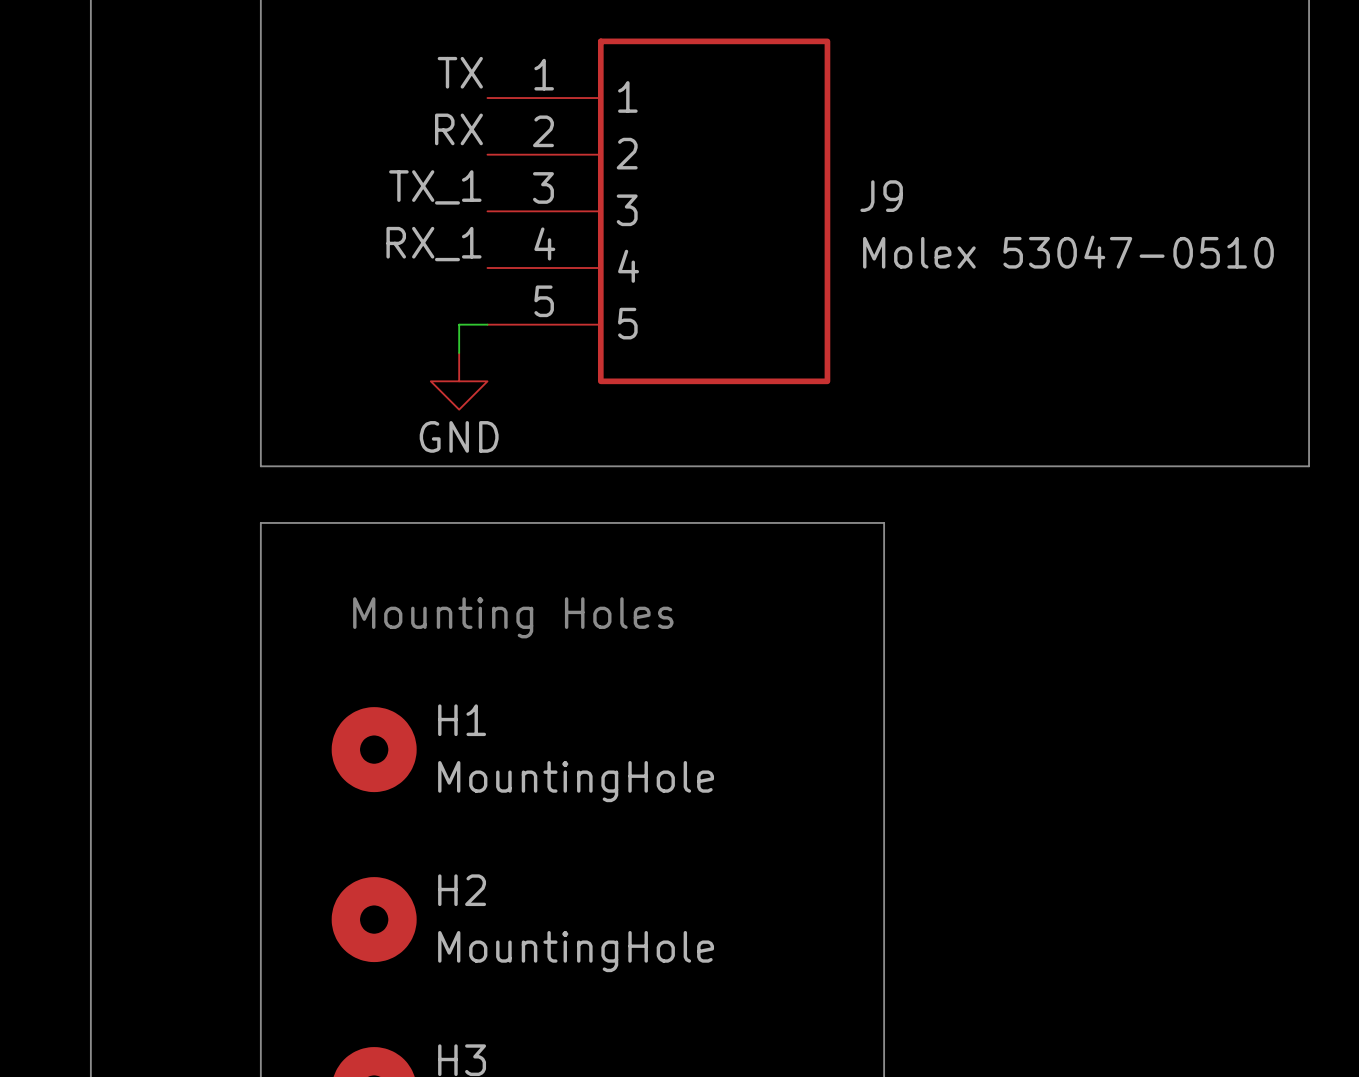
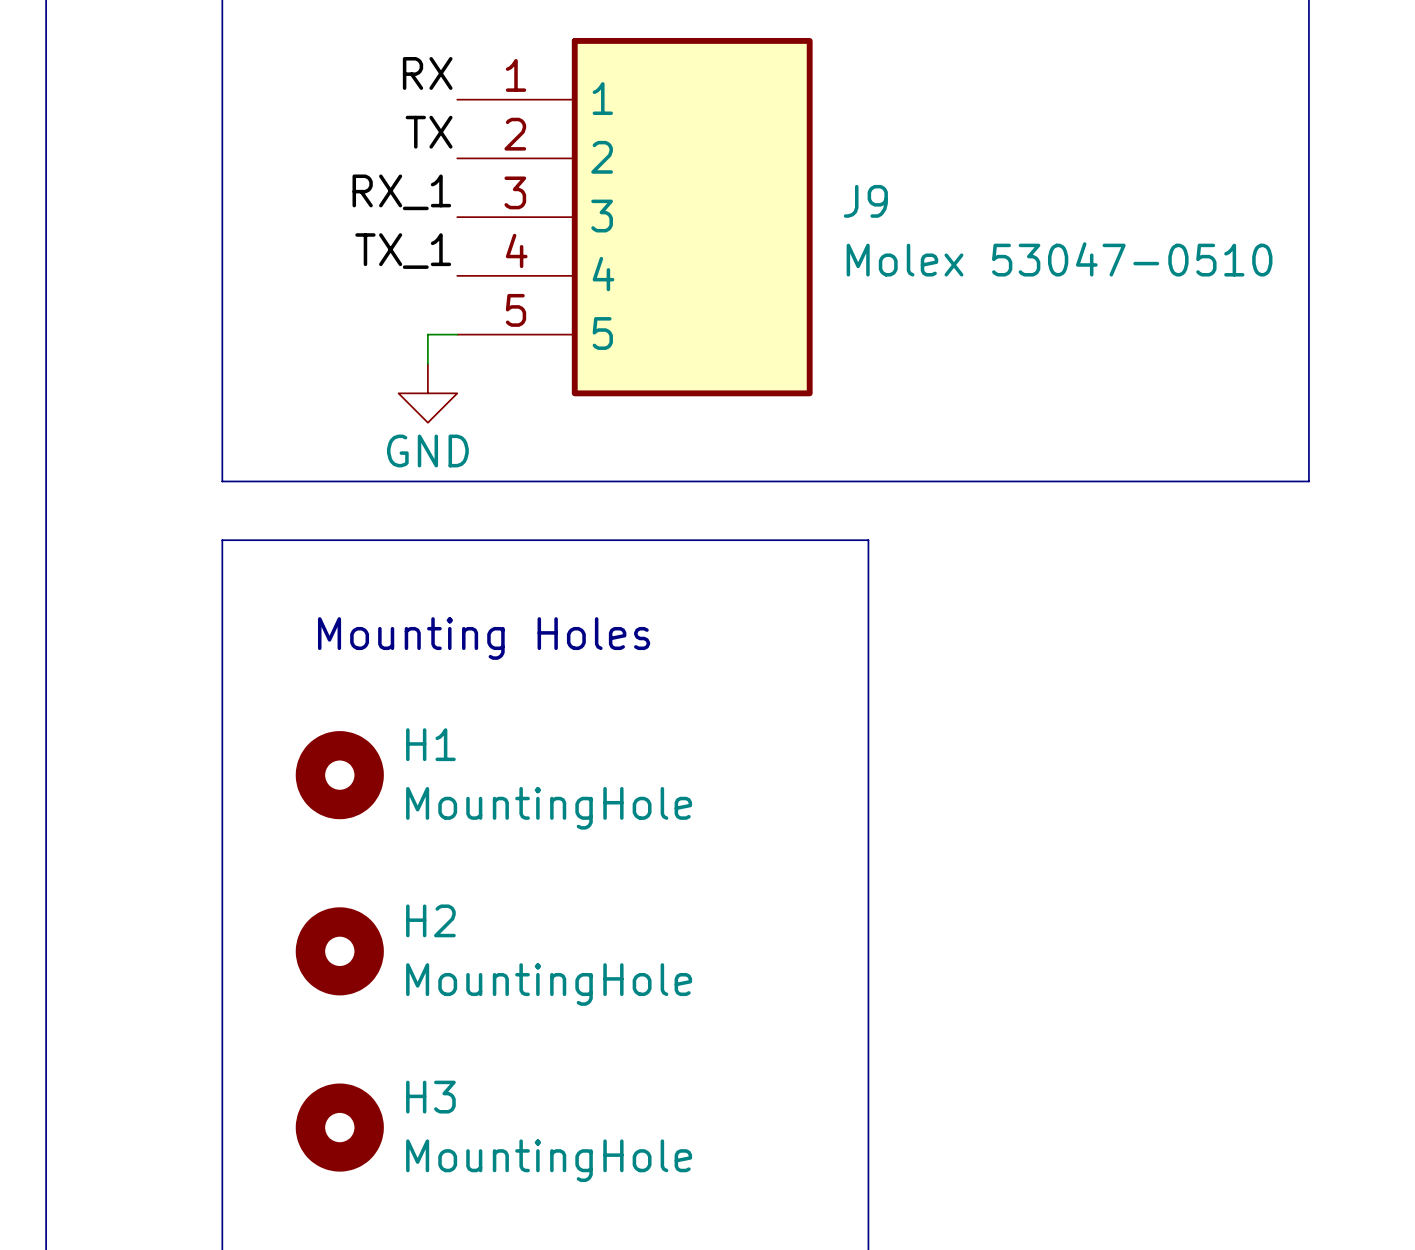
label: TX (460, 72) -> RX (427, 73)
label: RX (458, 129) -> TX (429, 132)
label: TX_1 (435, 187) -> RX_1 (401, 192)
label: RX_1 (433, 244) -> TX_1 (403, 251)

